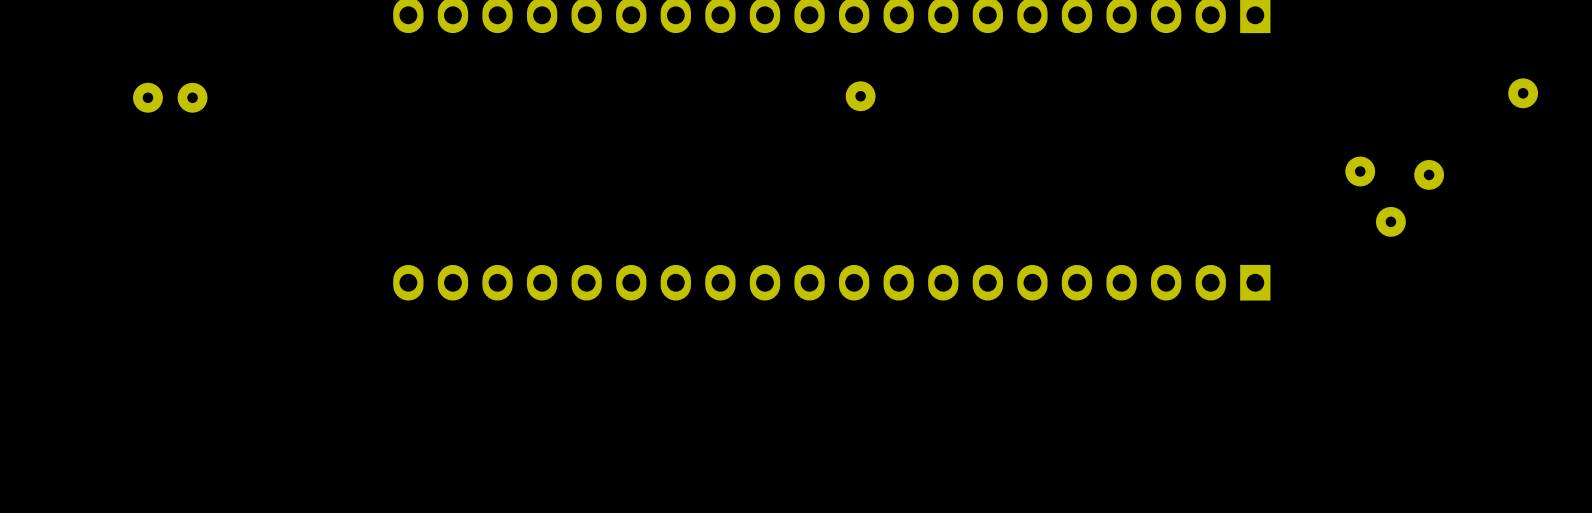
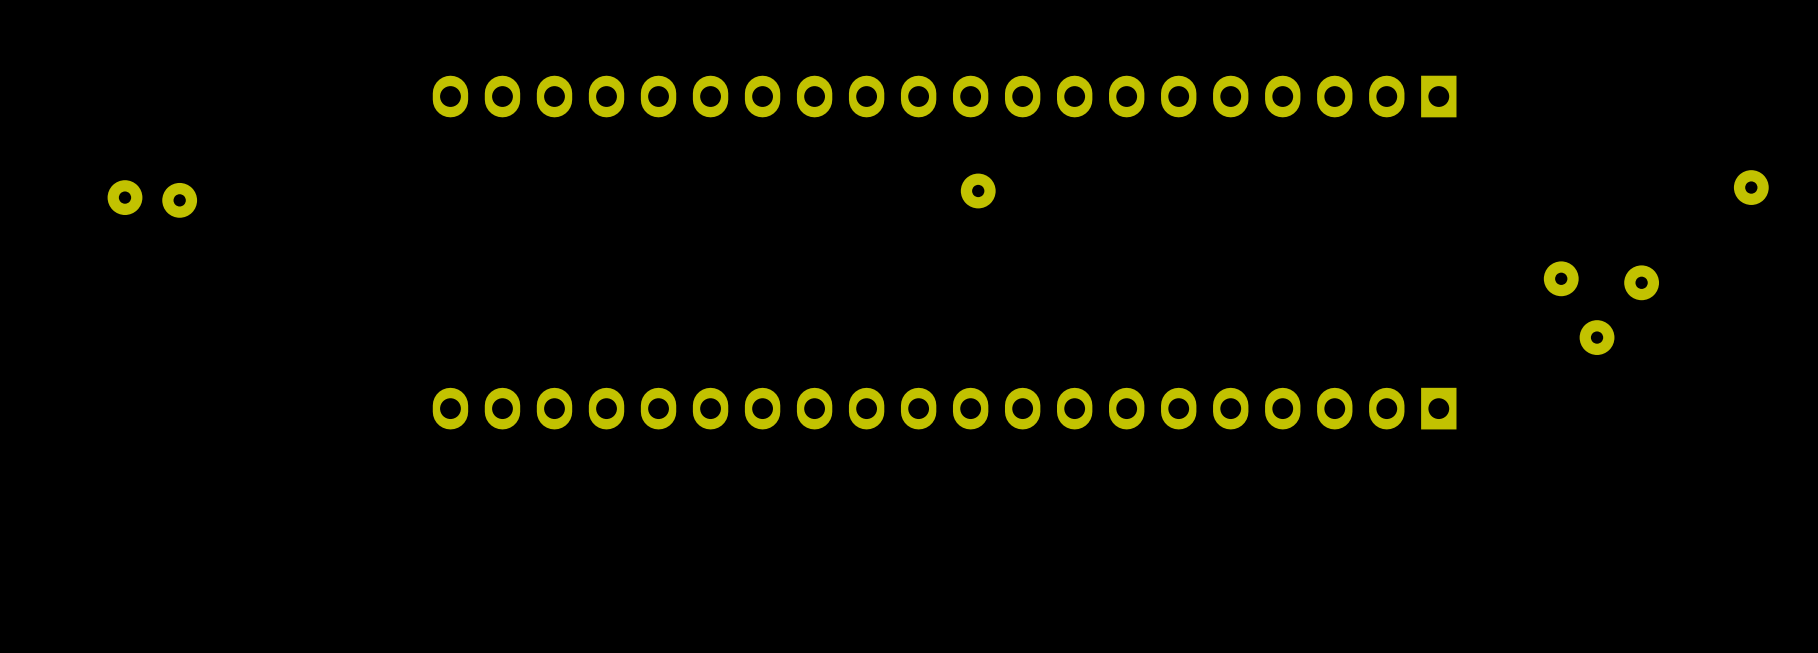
part: (147, 97) -> none
part: (192, 97) -> none
part: none -> (125, 197)
part: none -> (179, 200)

